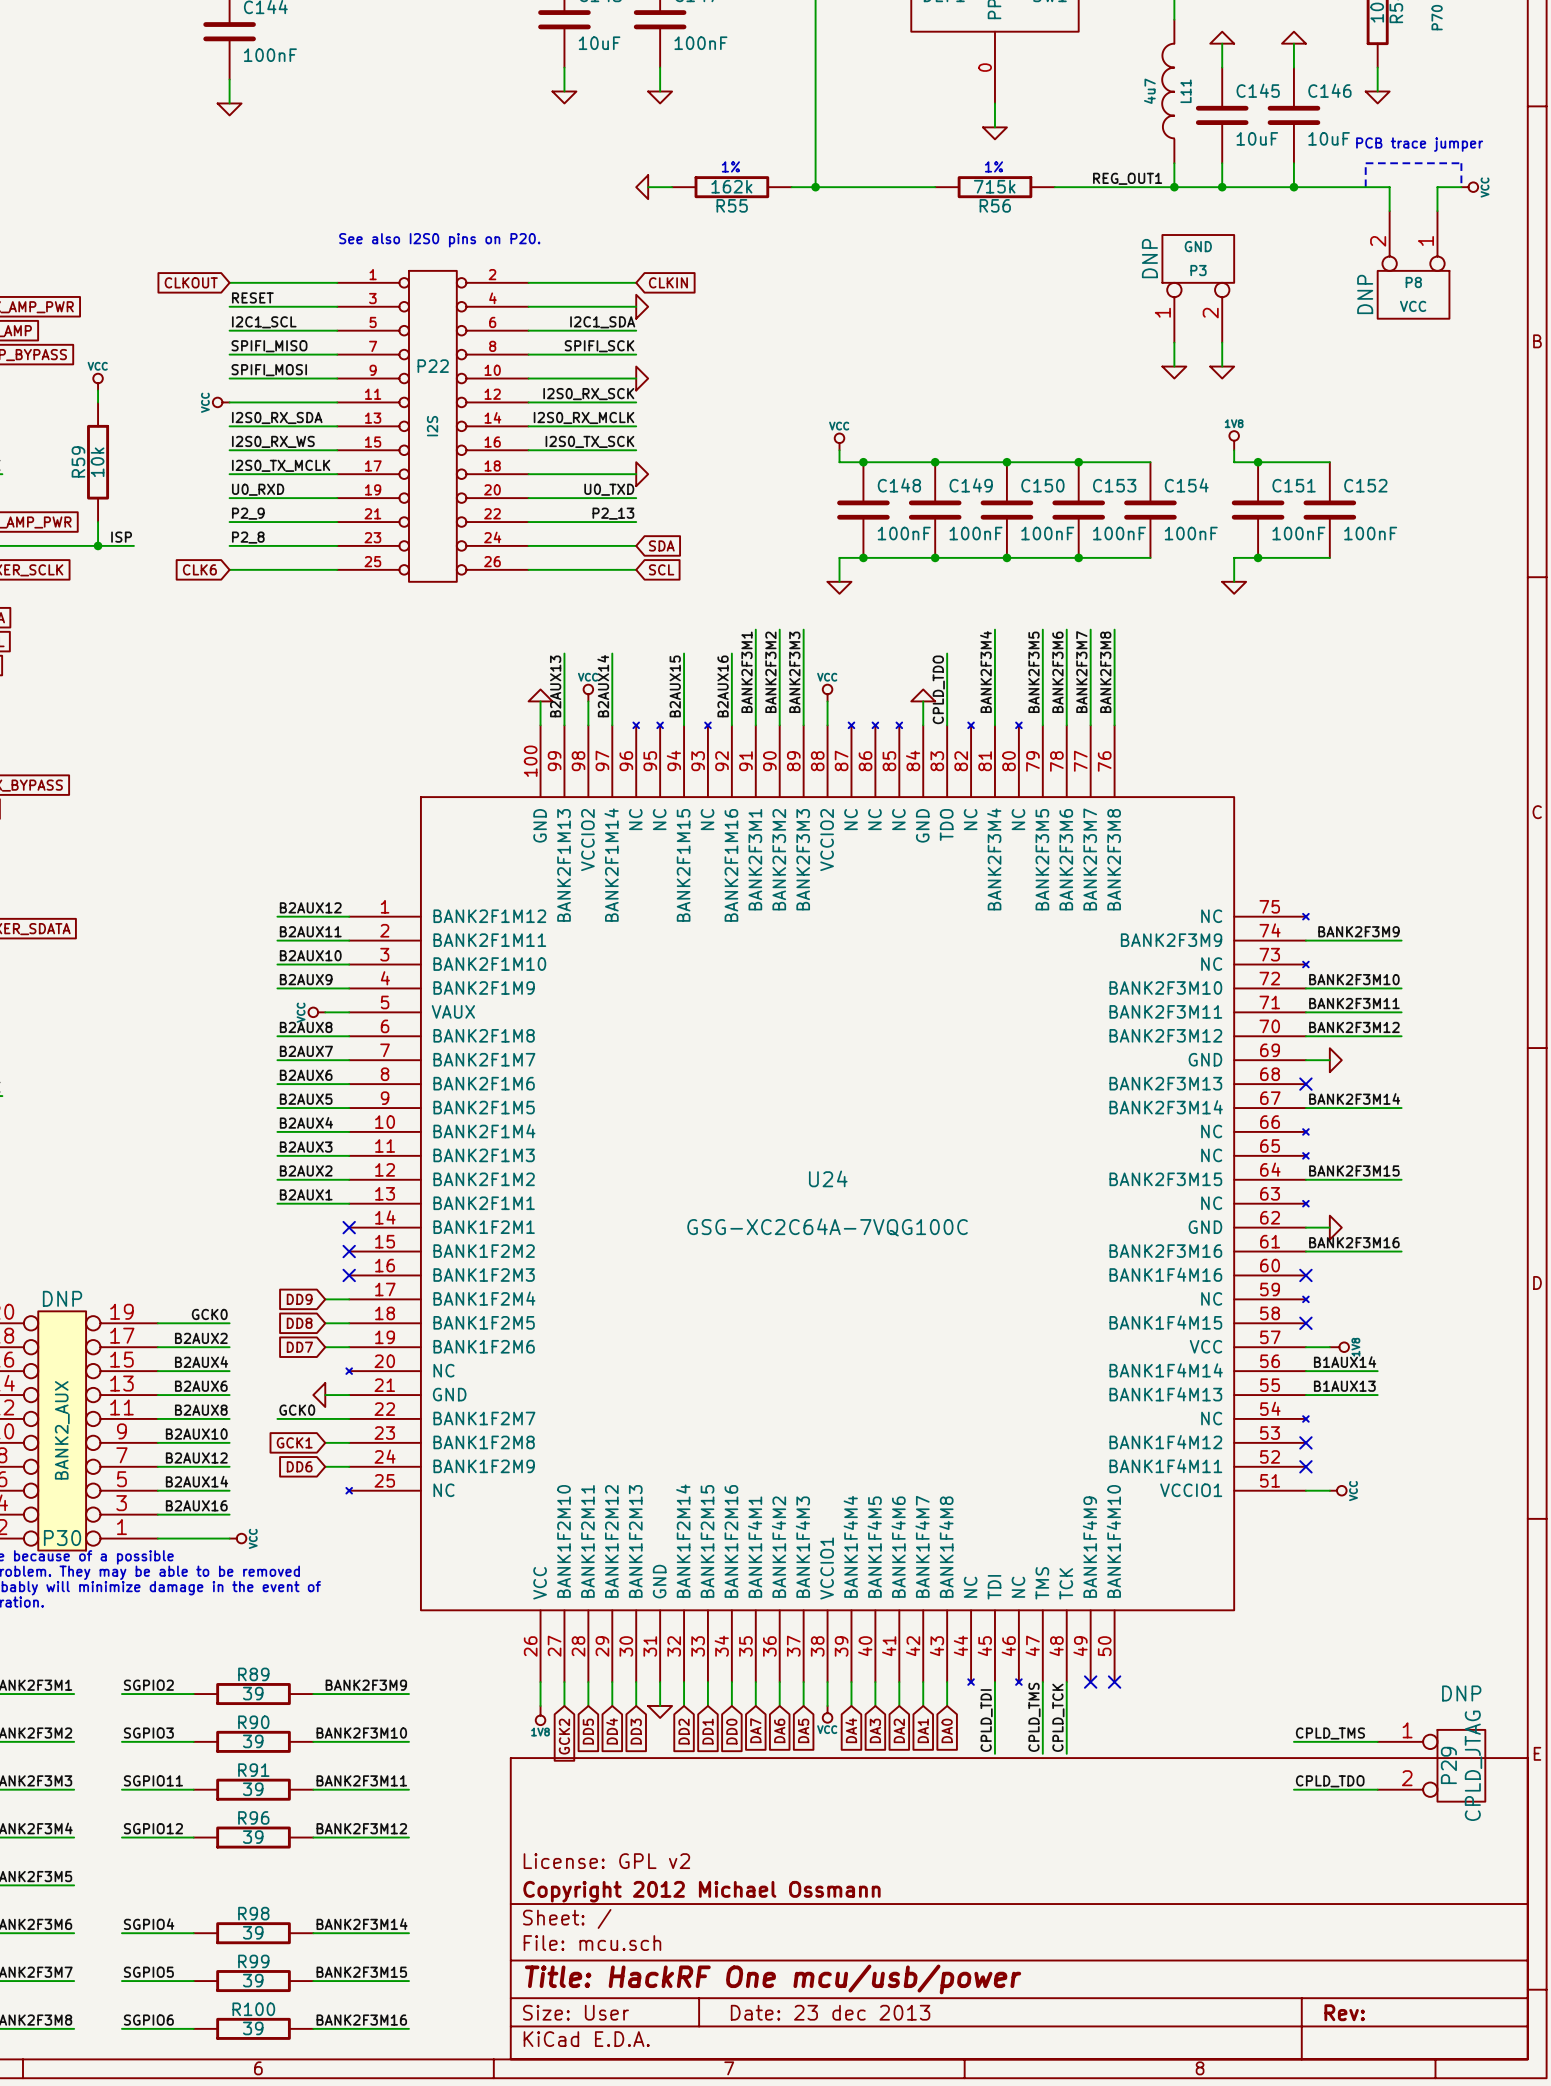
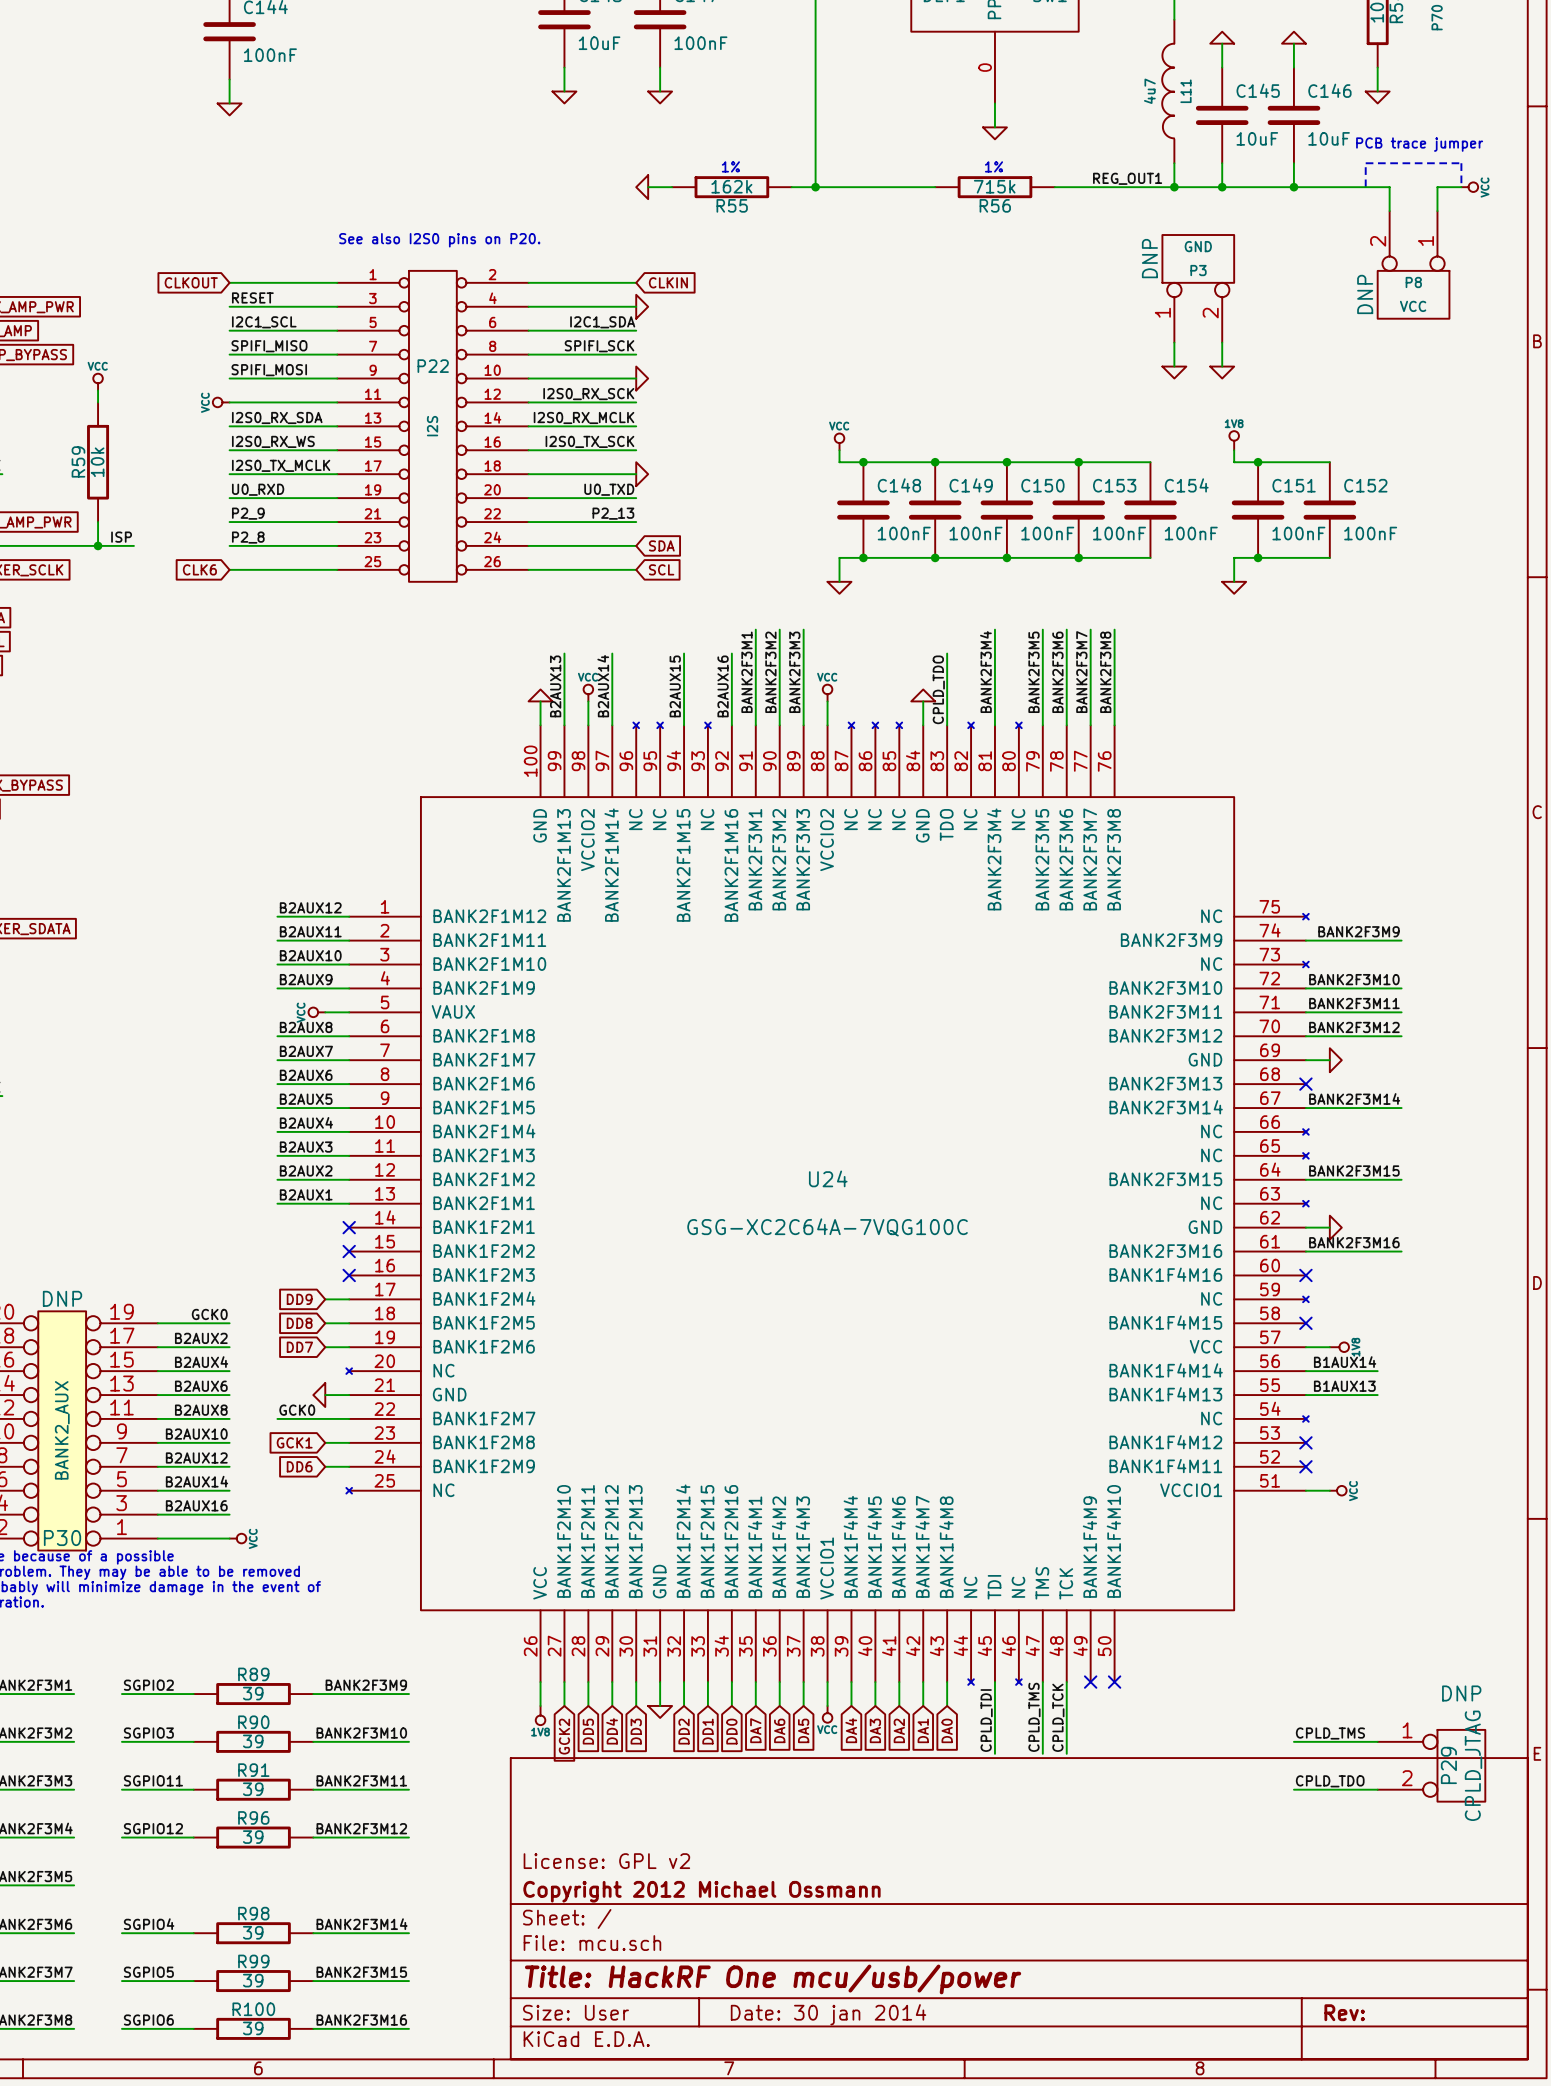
title block: Date: 23 dec 2013 (830, 2012) -> Date: 30 jan 2014 (828, 2014)

